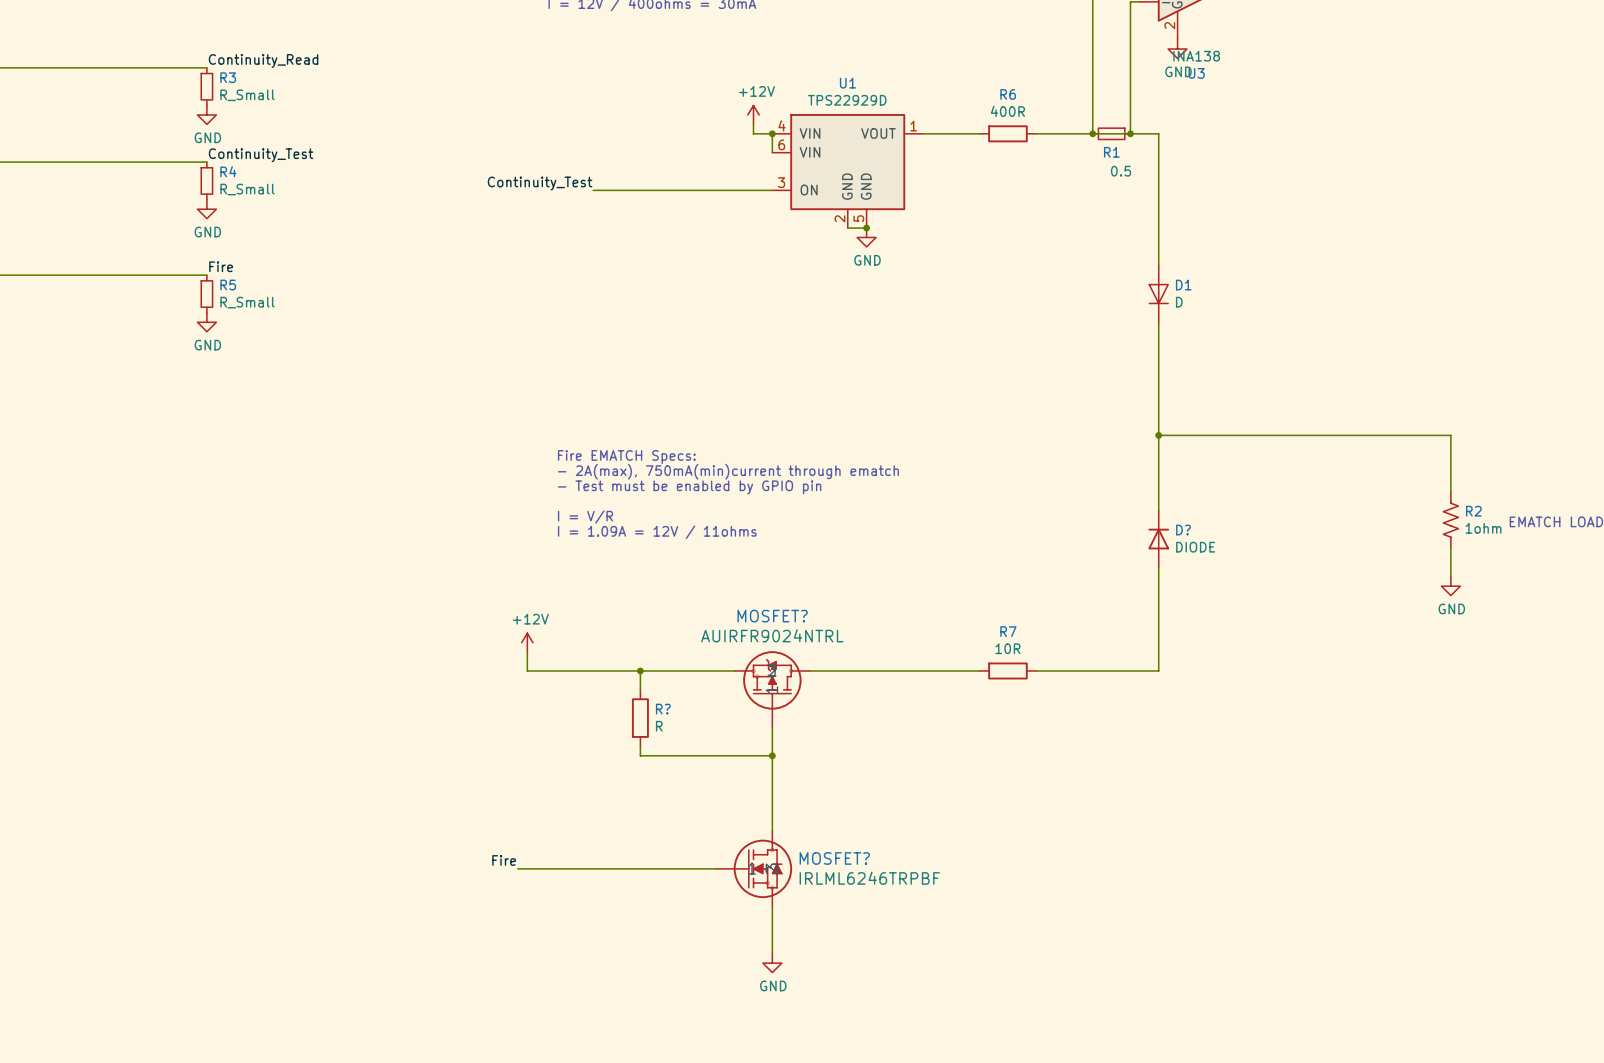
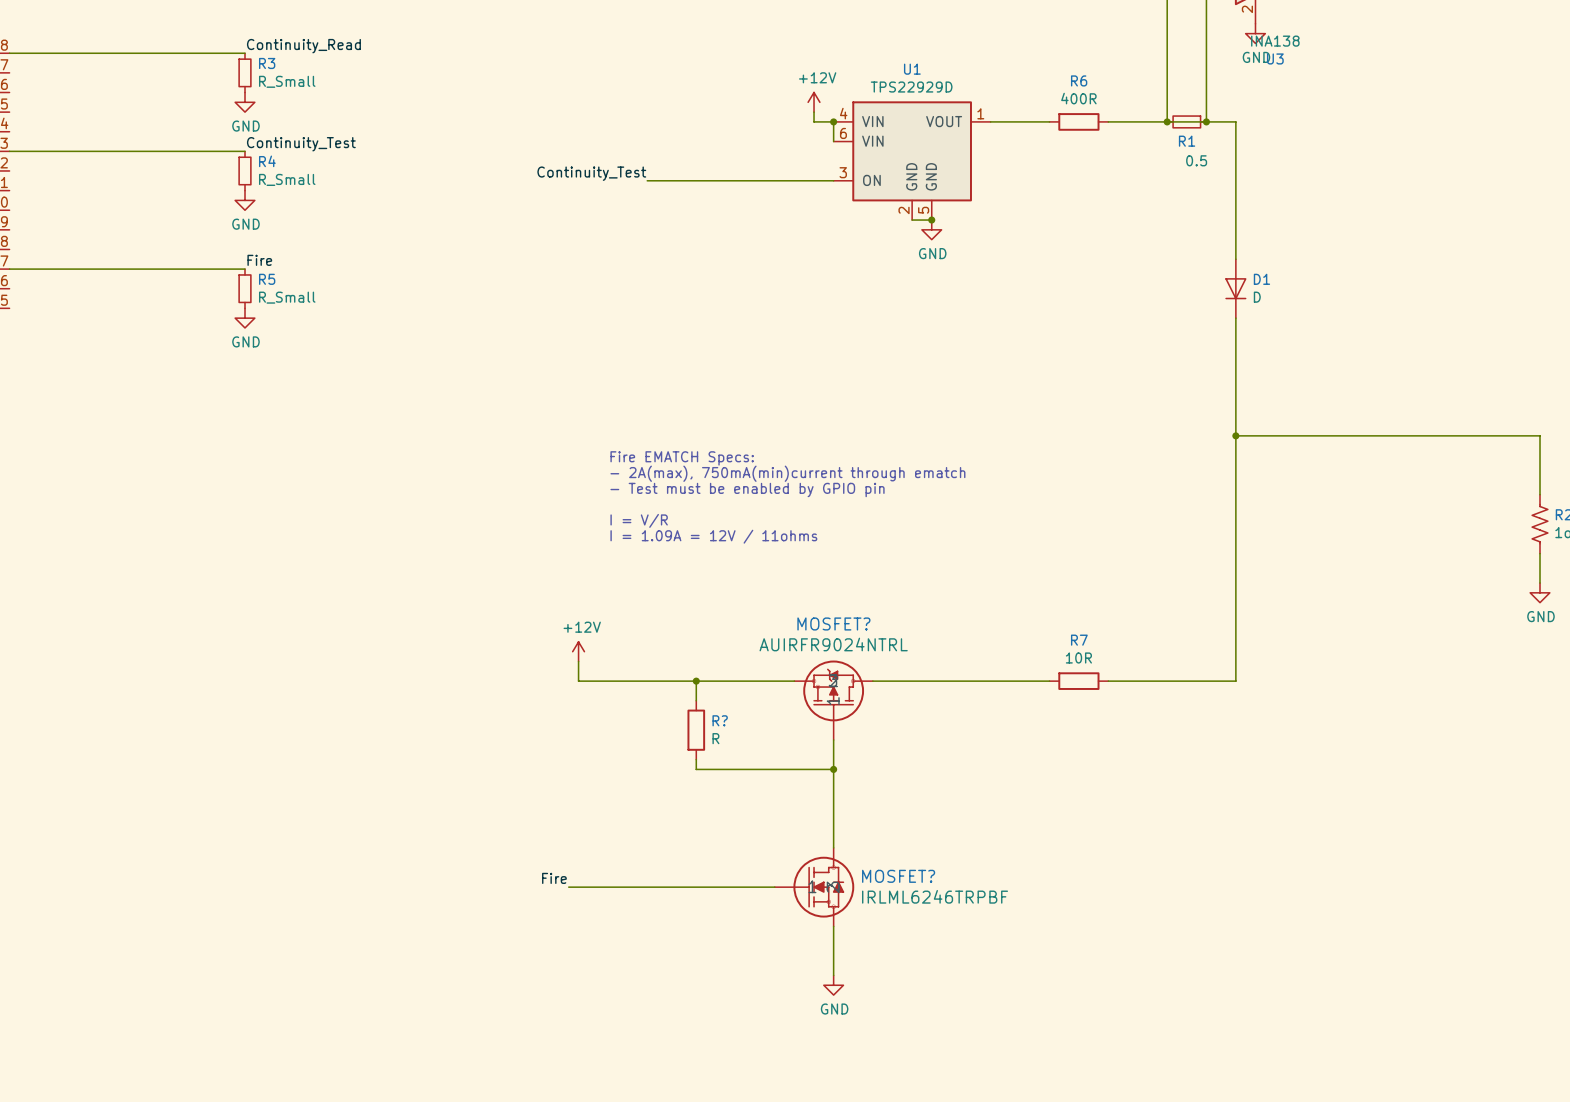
D?: DIODE (1158, 539) -> none

